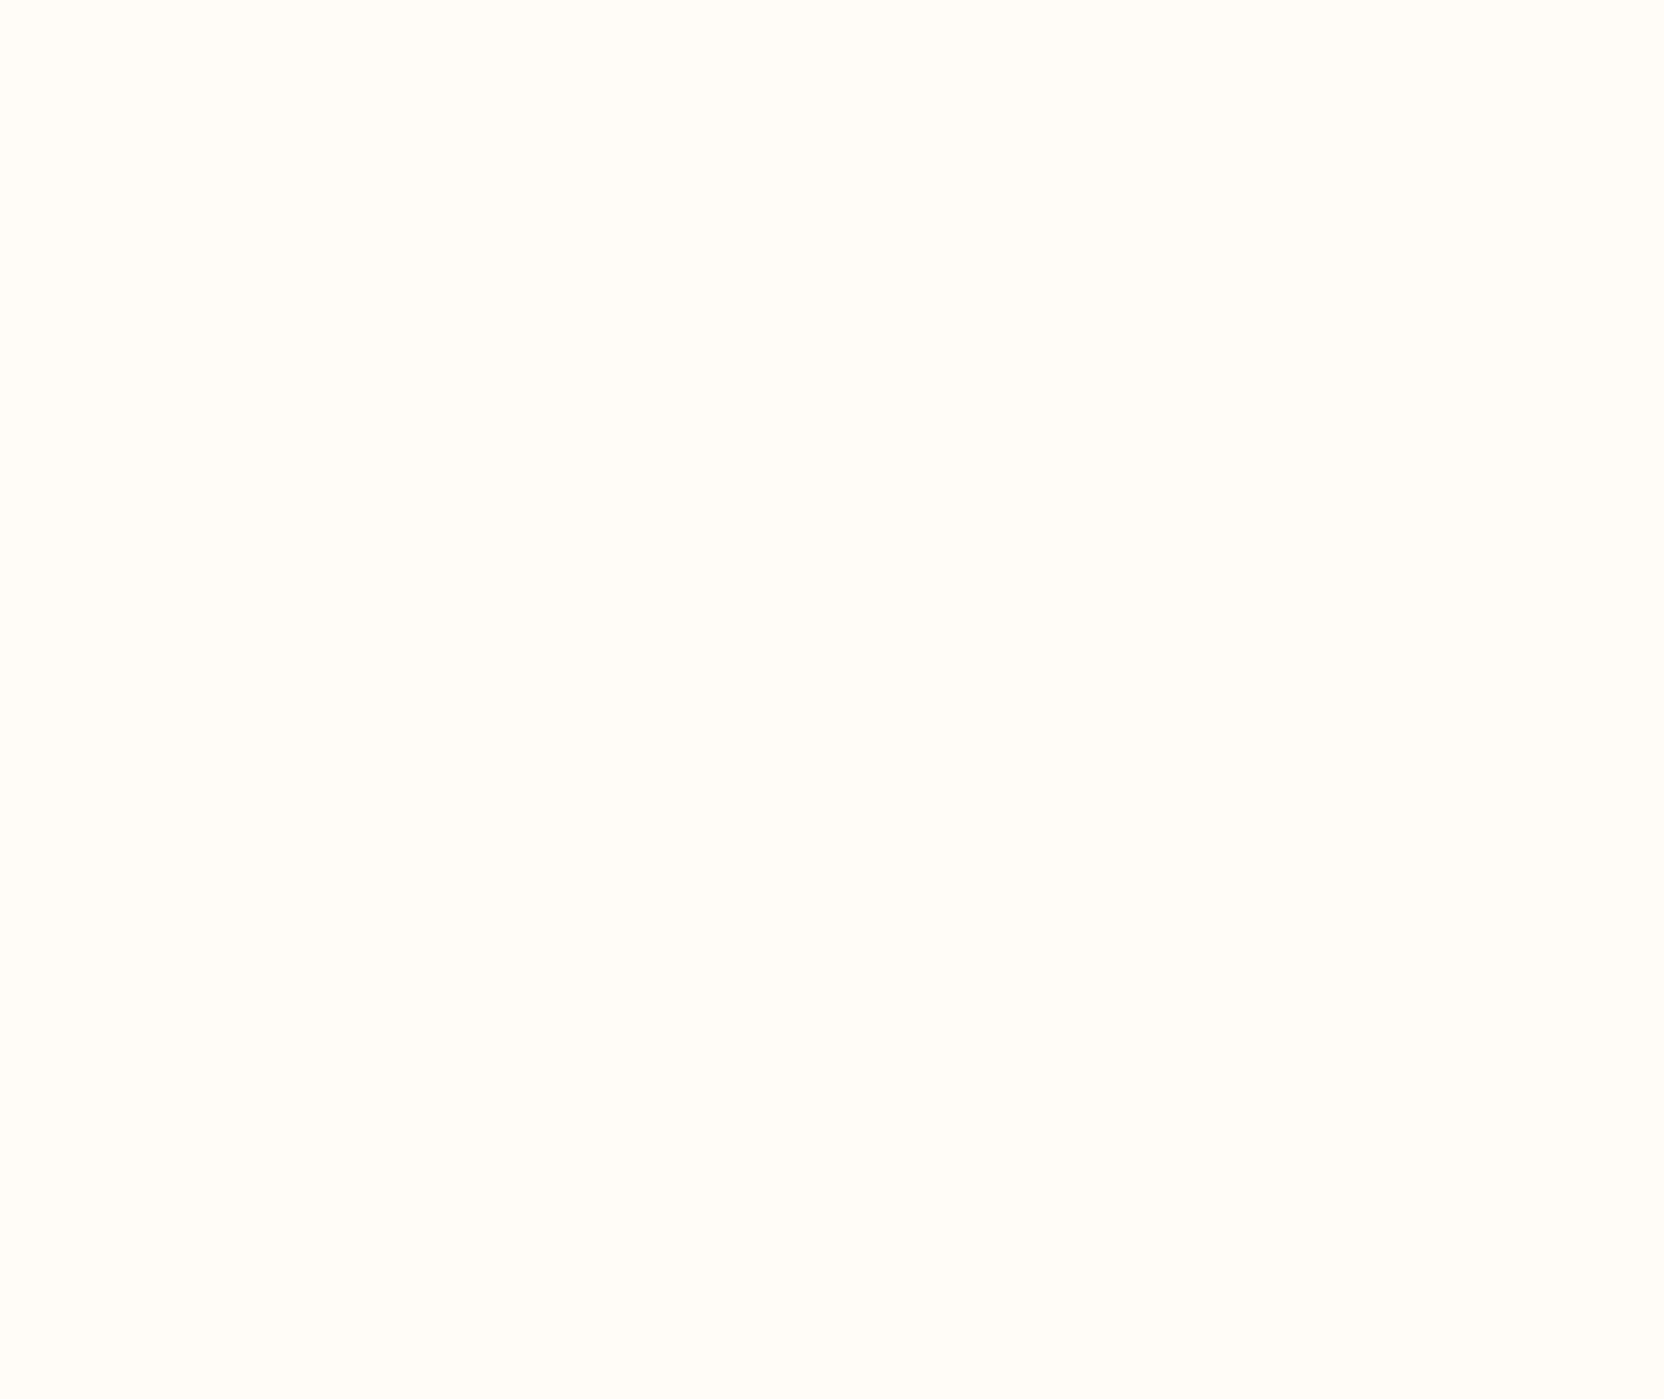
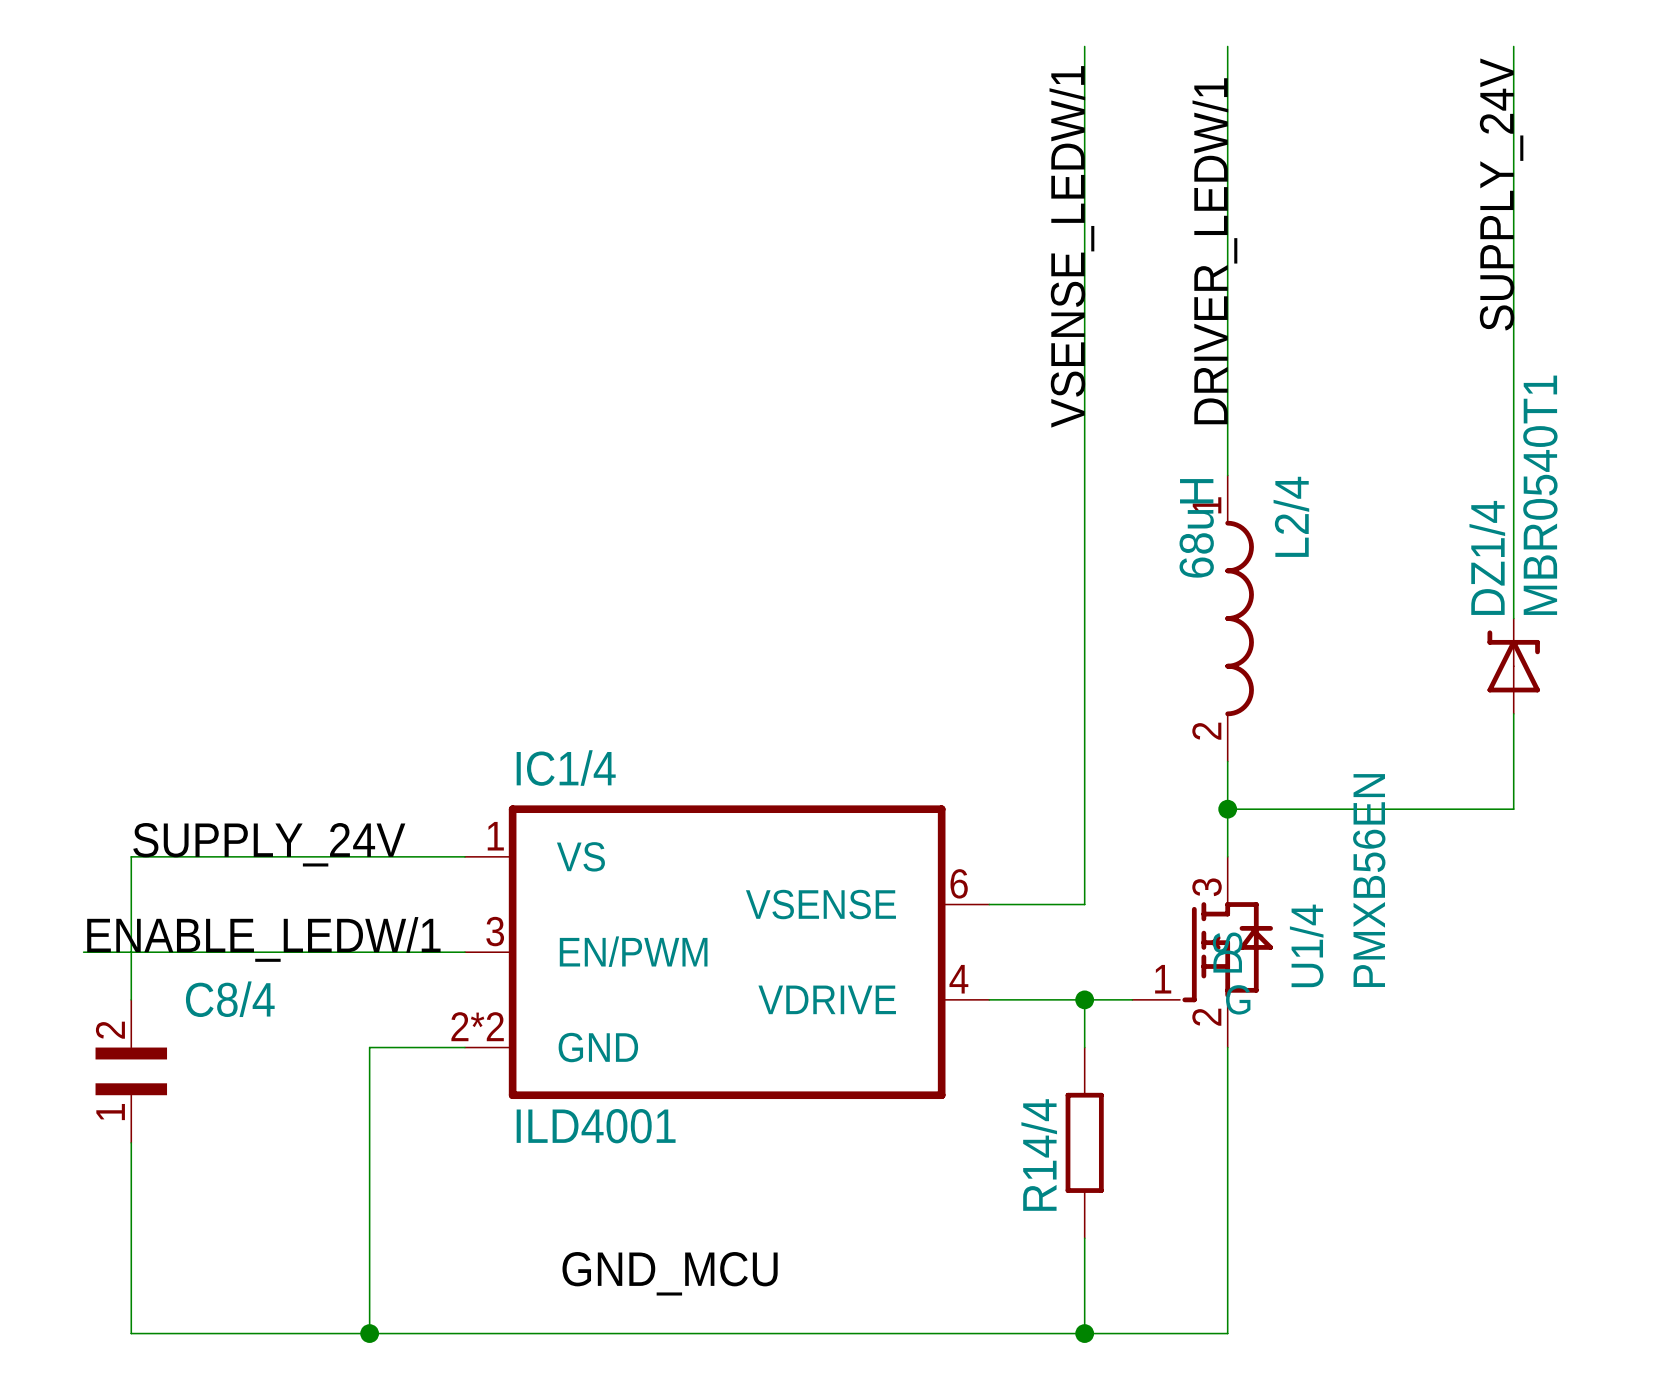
wire: none -> (1084, 46) (1084, 904) (989, 904)
wire: none -> (1227, 46) (1227, 475)
wire: none -> (1513, 46) (1513, 618)
label: none -> SUPPLY_24V (1501, 194)
label: none -> VSENSE_LEDW/1 (1071, 246)
label: none -> DRIVER_LEDW/1 (1214, 251)
L2/4: none -> 68uH (1239, 618)
DZ1/4: none -> MBR0540T1 (1513, 666)
wire: none -> (1513, 713) (1513, 809) (1227, 809)
wire: none -> (1227, 761) (1227, 856)
junction: none -> (1227, 809)
label: none -> SUPPLY_24V (269, 844)
wire: none -> (464, 856) (131, 856) (131, 999)
label: none -> ENABLE_LEDW/1 (263, 939)
wire: none -> (83, 952) (464, 952)
IC1/4: none -> ILD4001 (727, 952)
U1/4: none -> PMXB56EN (1202, 952)
wire: none -> (989, 999) (1132, 999)
wire: none -> (1084, 999) (1084, 1047)
junction: none -> (1084, 999)
wire: none -> (464, 1047) (369, 1047) (369, 1333)
wire: none -> (1227, 1047) (1227, 1333) (131, 1333) (131, 1142)
C8/4: none -> (131, 1071)
R14/4: none -> (1084, 1142)
wire: none -> (1084, 1238) (1084, 1333)
label: none -> GND_MCU (670, 1273)
junction: none -> (369, 1333)
junction: none -> (1084, 1333)

